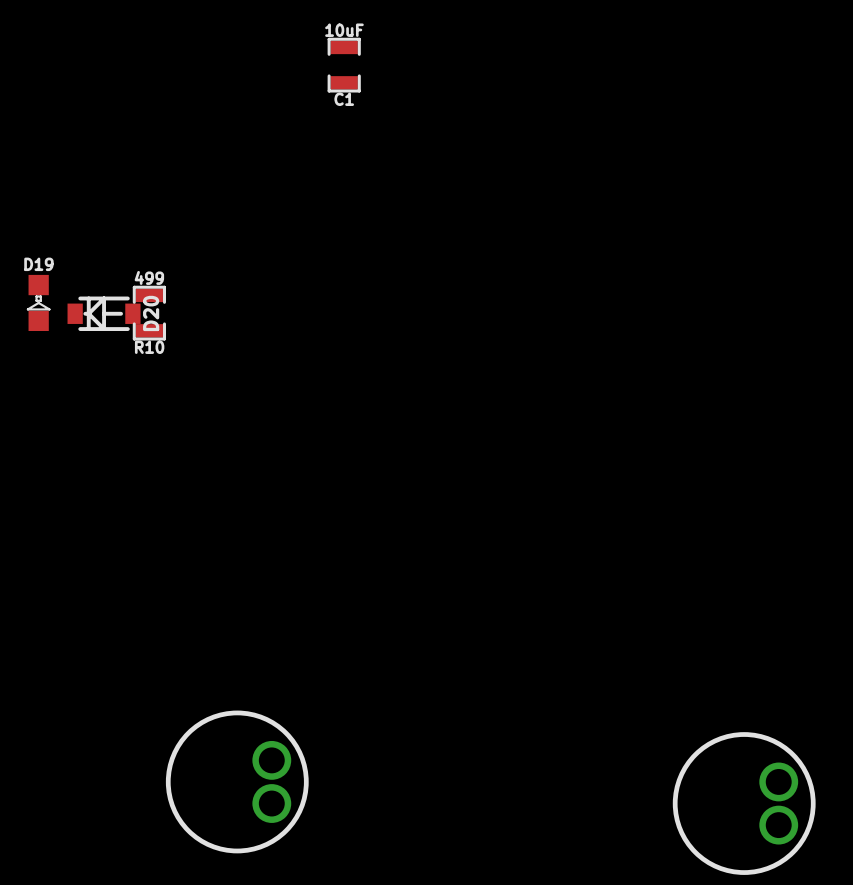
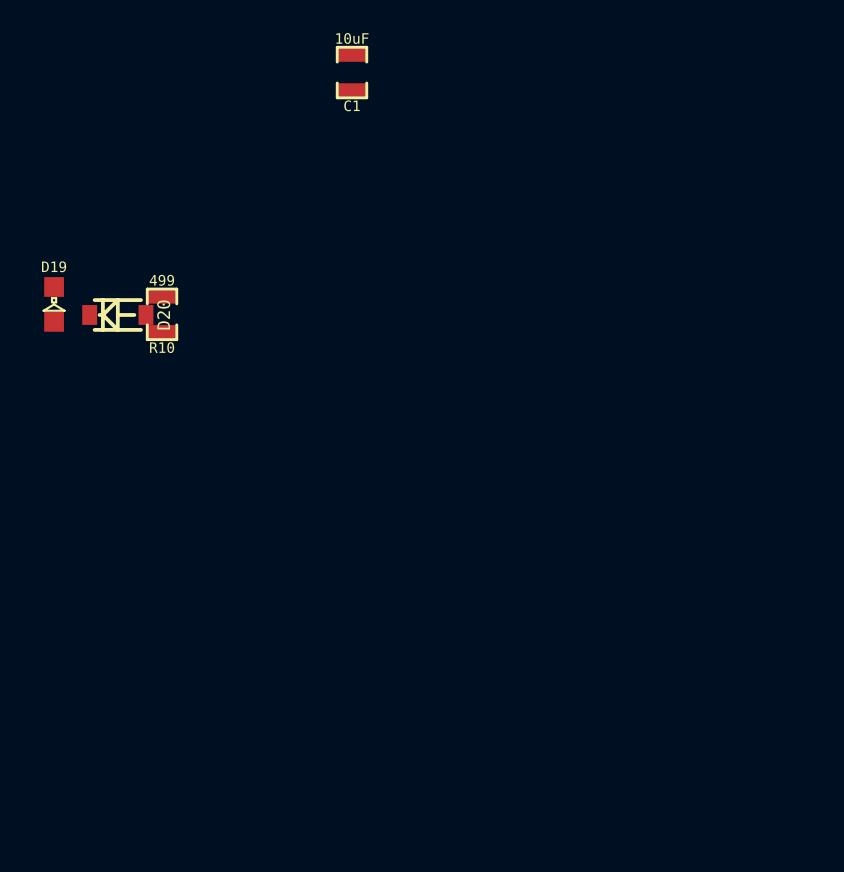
part: (237, 781) -> none
part: (744, 803) -> none

